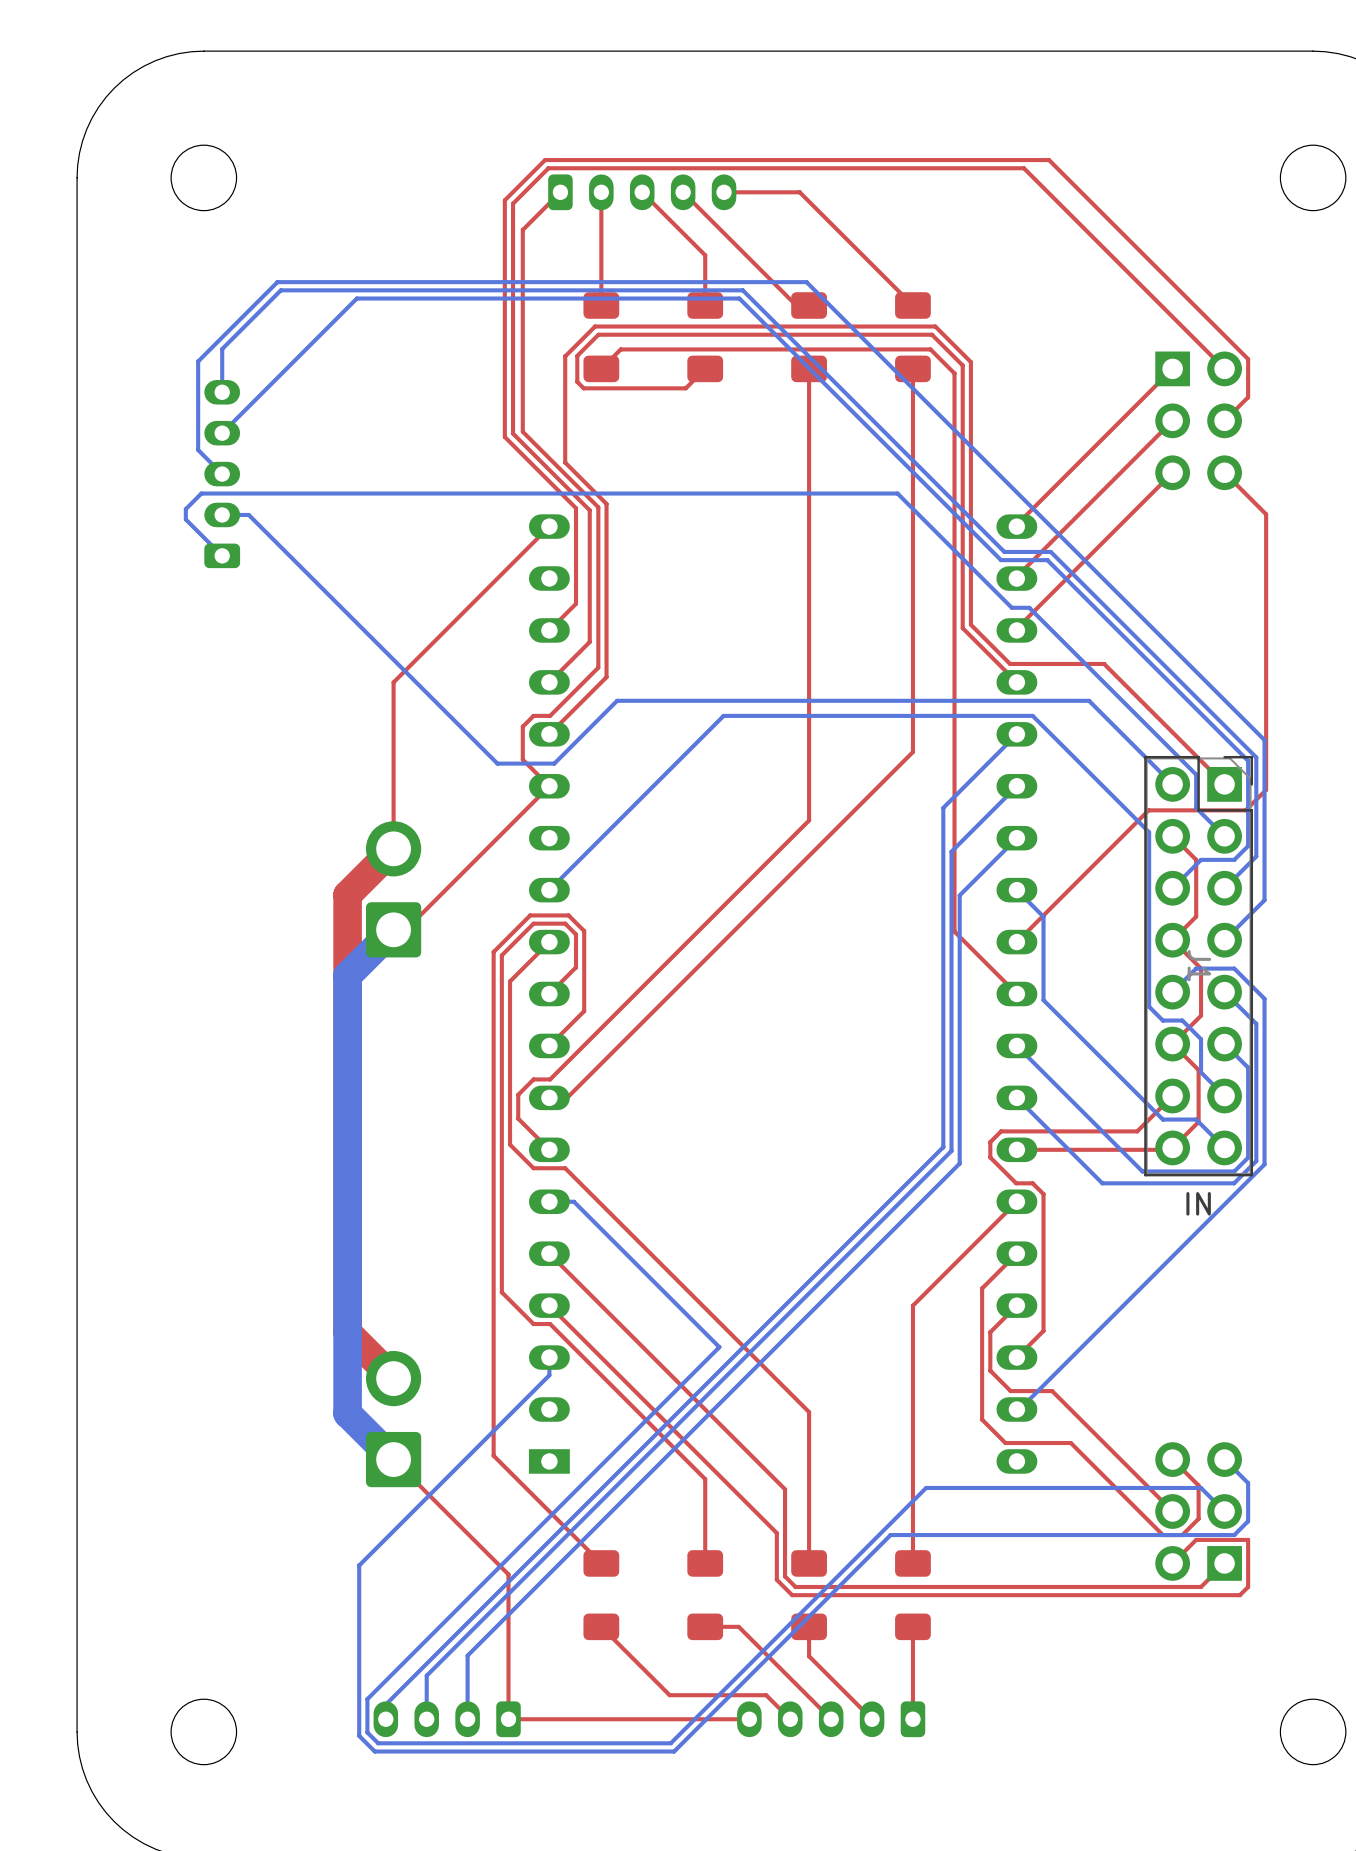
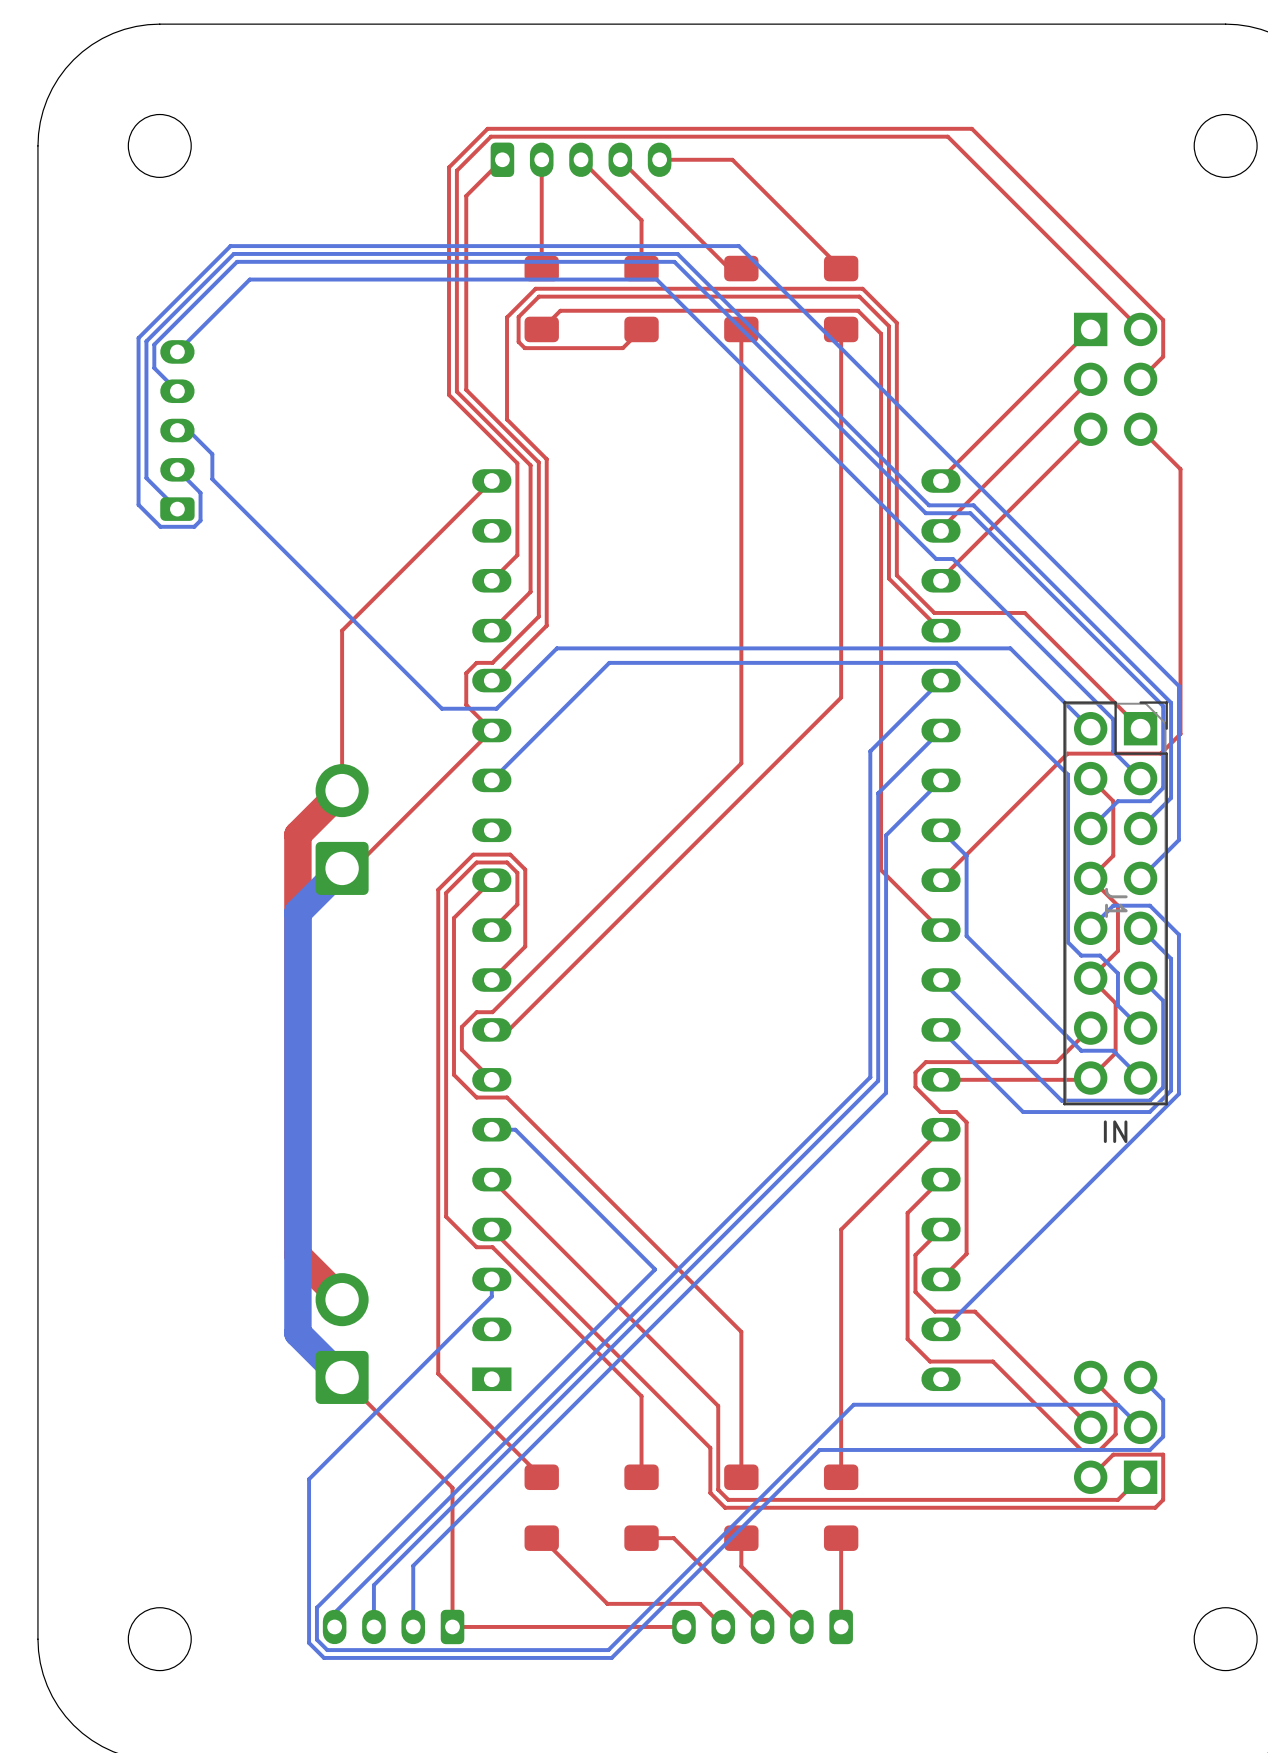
bottom track: (356, 298) (222, 433) -> (306, 261) (237, 261) (154, 344)
bottom track: (222, 349) (222, 392) -> (177, 310) (146, 341) (146, 478)
bottom track: (198, 361) (198, 384) -> (154, 322) (138, 338) (138, 504) (160, 526) (194, 526) (200, 520) (200, 492) (177, 469)
bottom track: (198, 409) (198, 450) (222, 474) -> (154, 368) (177, 391)
bottom track: (897, 493) (201, 493) (185, 509) (185, 519) (189, 523) -> (826, 449) (656, 279) (249, 279) (177, 351)
bottom track: (222, 514) (248, 514) (258, 524) -> (188, 430) (212, 454) (212, 479)
bottom track: (723, 715) (549, 890) -> (659, 662) (609, 662) (491, 780)

